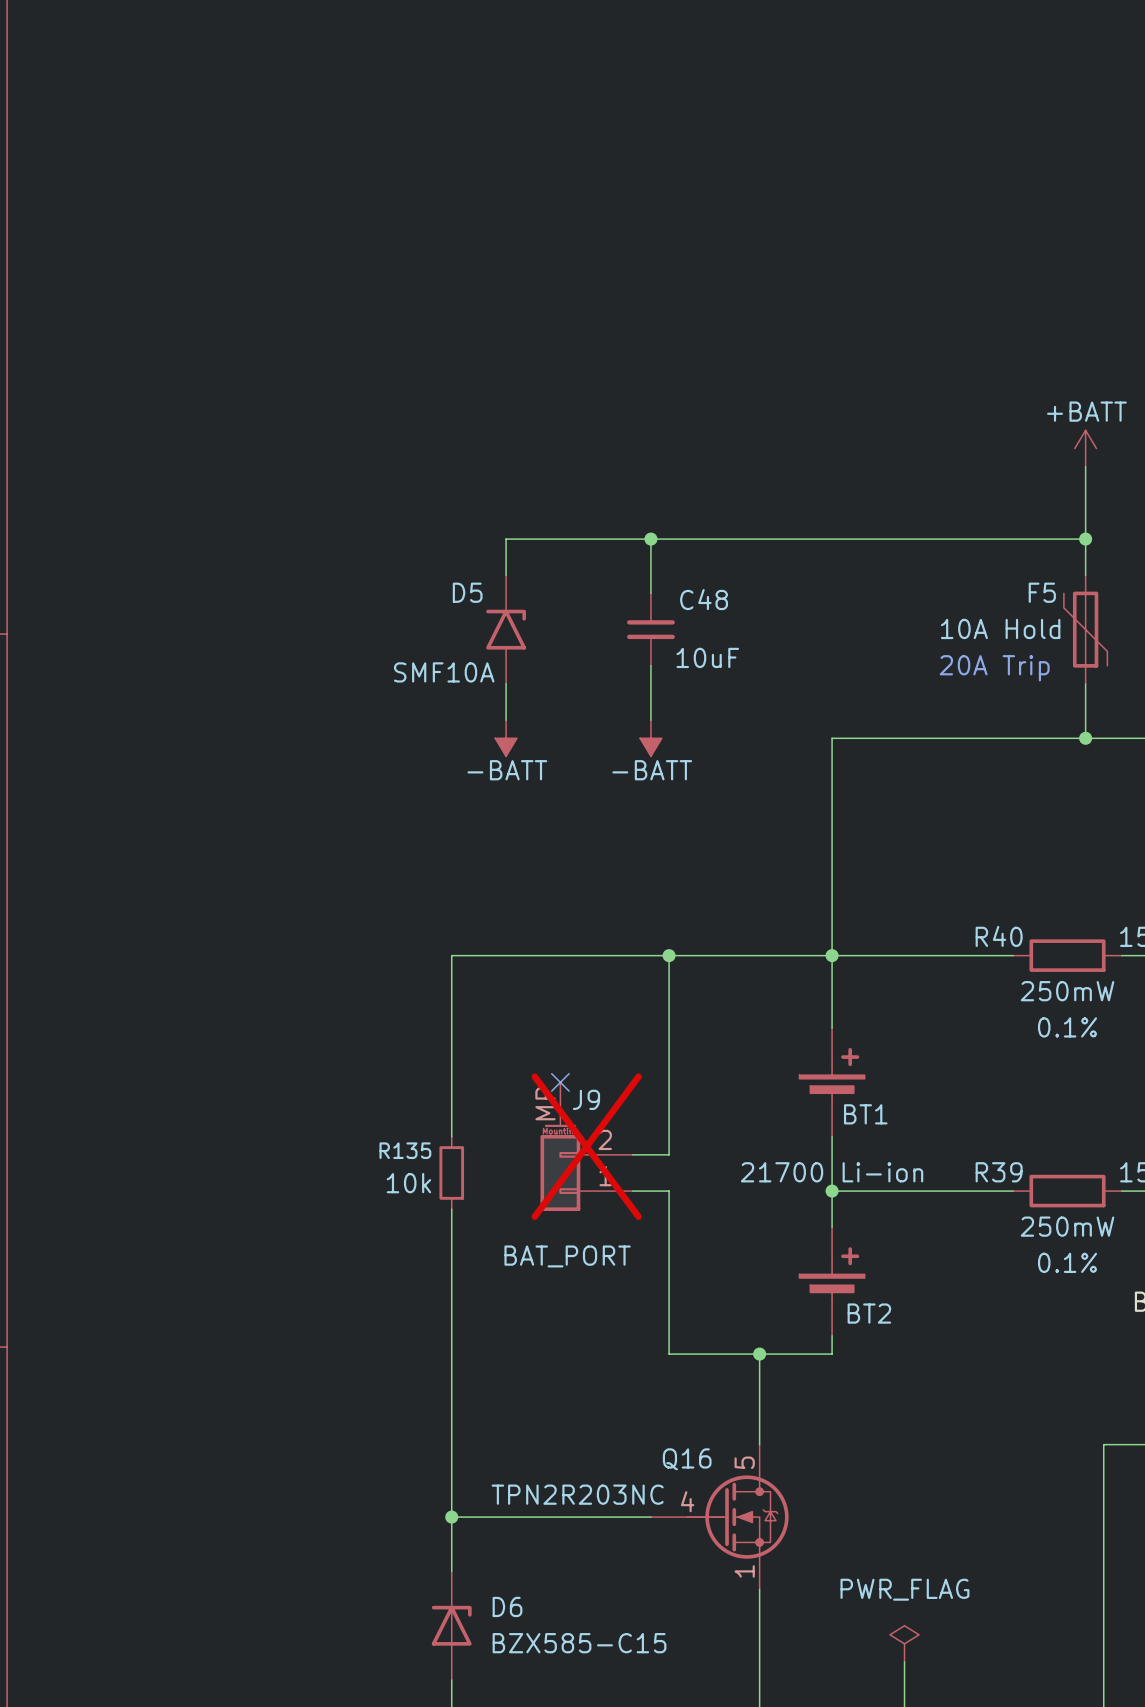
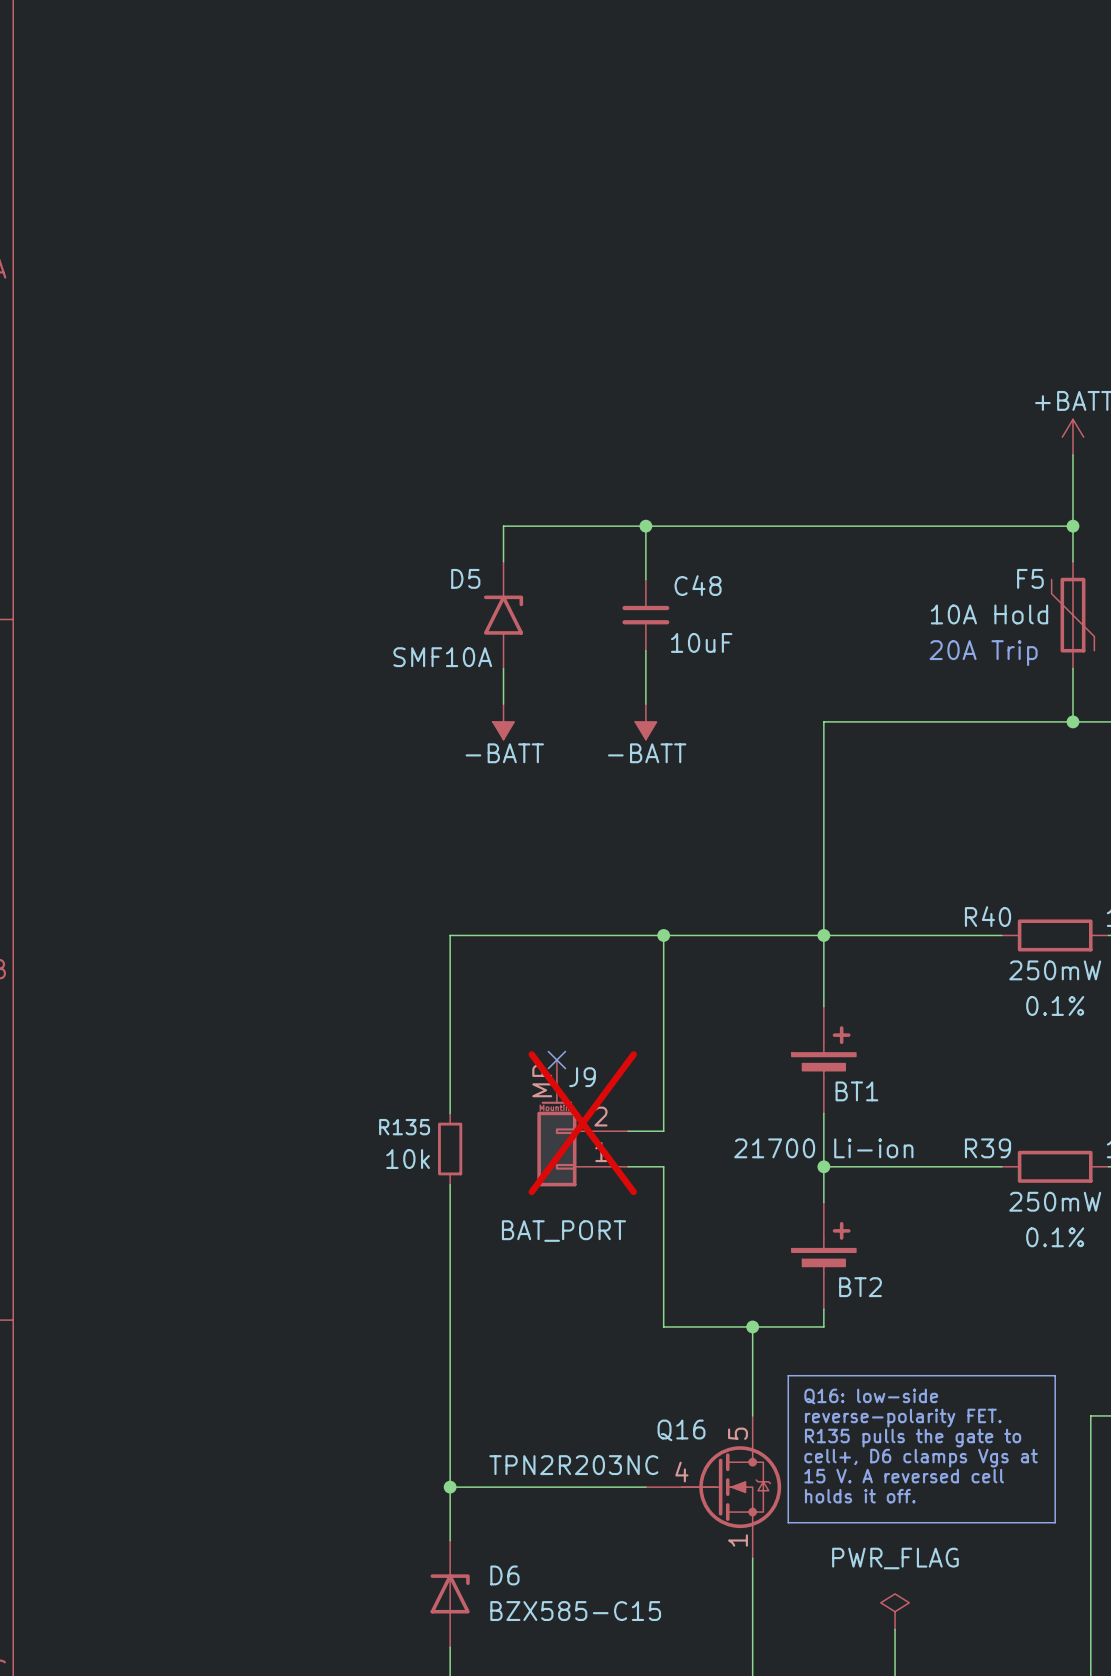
line: none -> (788, 1375) (1055, 1375) (1055, 1522) (788, 1522) (788, 1375)
text: none -> Q16: low-side (871, 1396)
text: none -> reverse-polarity FET. (903, 1418)
text: none -> R135 pulls the gate to (913, 1438)
text: none -> cell+, D6 clamps Vgs at (921, 1458)
text: none -> 15 V. A reversed cell (904, 1476)
text: none -> holds it off. (860, 1496)

